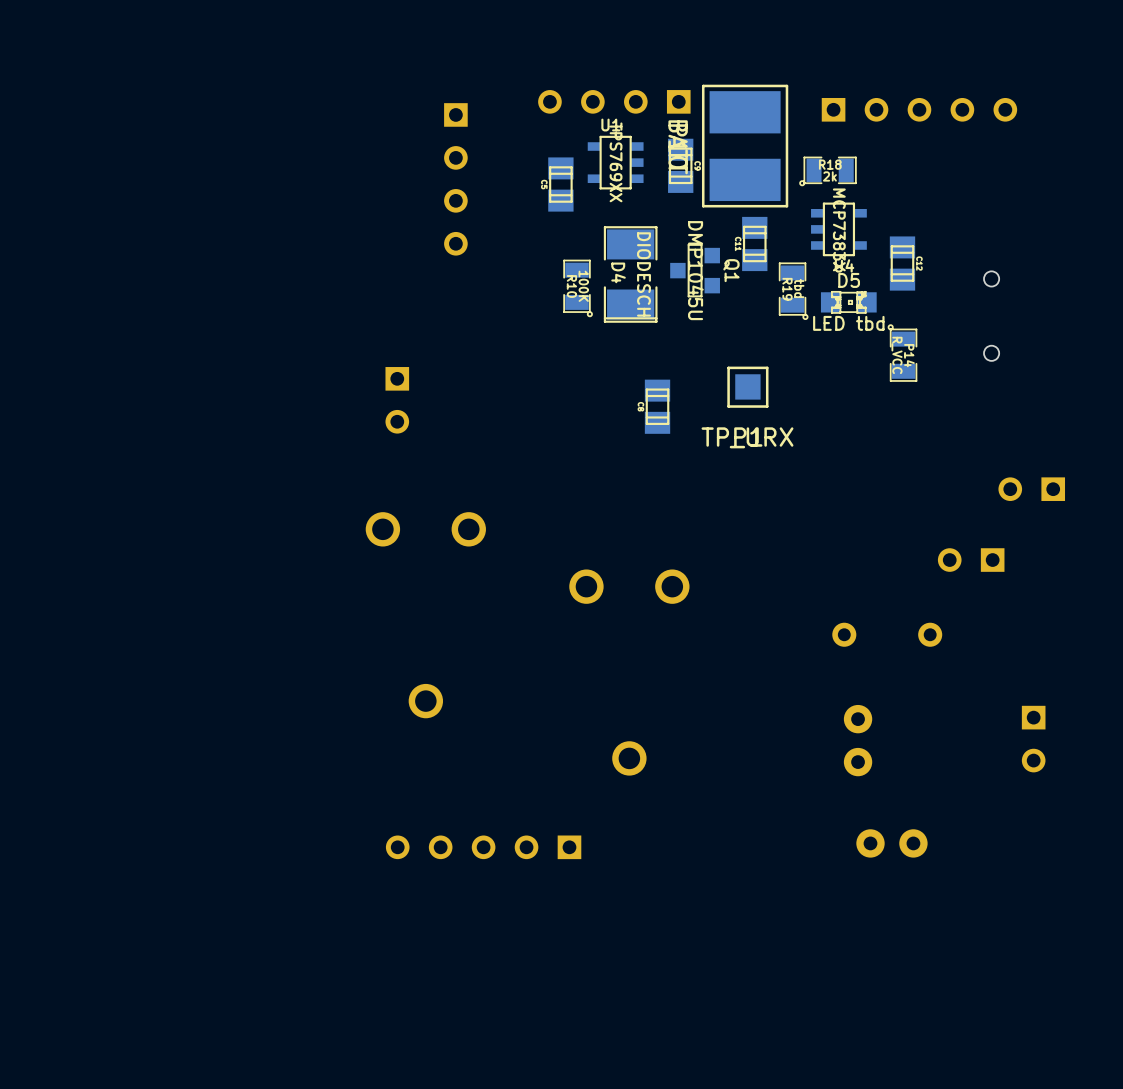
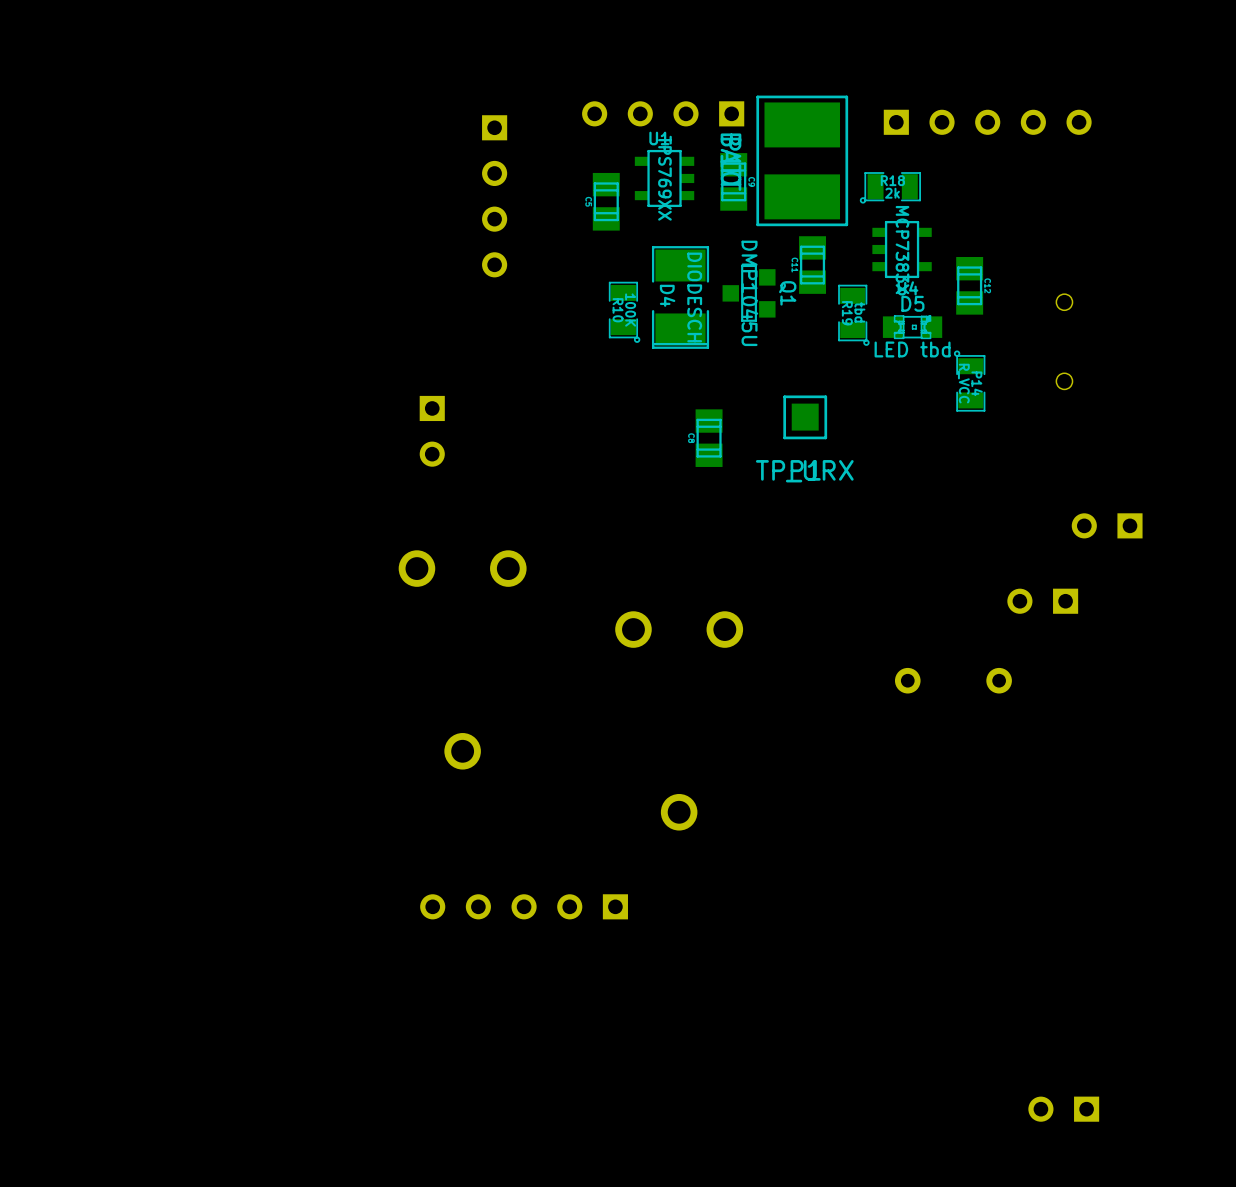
part rotation: 0° (1033, 739) -> 90° clockwise (1063, 1109)
part position: (1033, 739) -> (1063, 1109)
part: (858, 740) -> none
part: (891, 843) -> none

